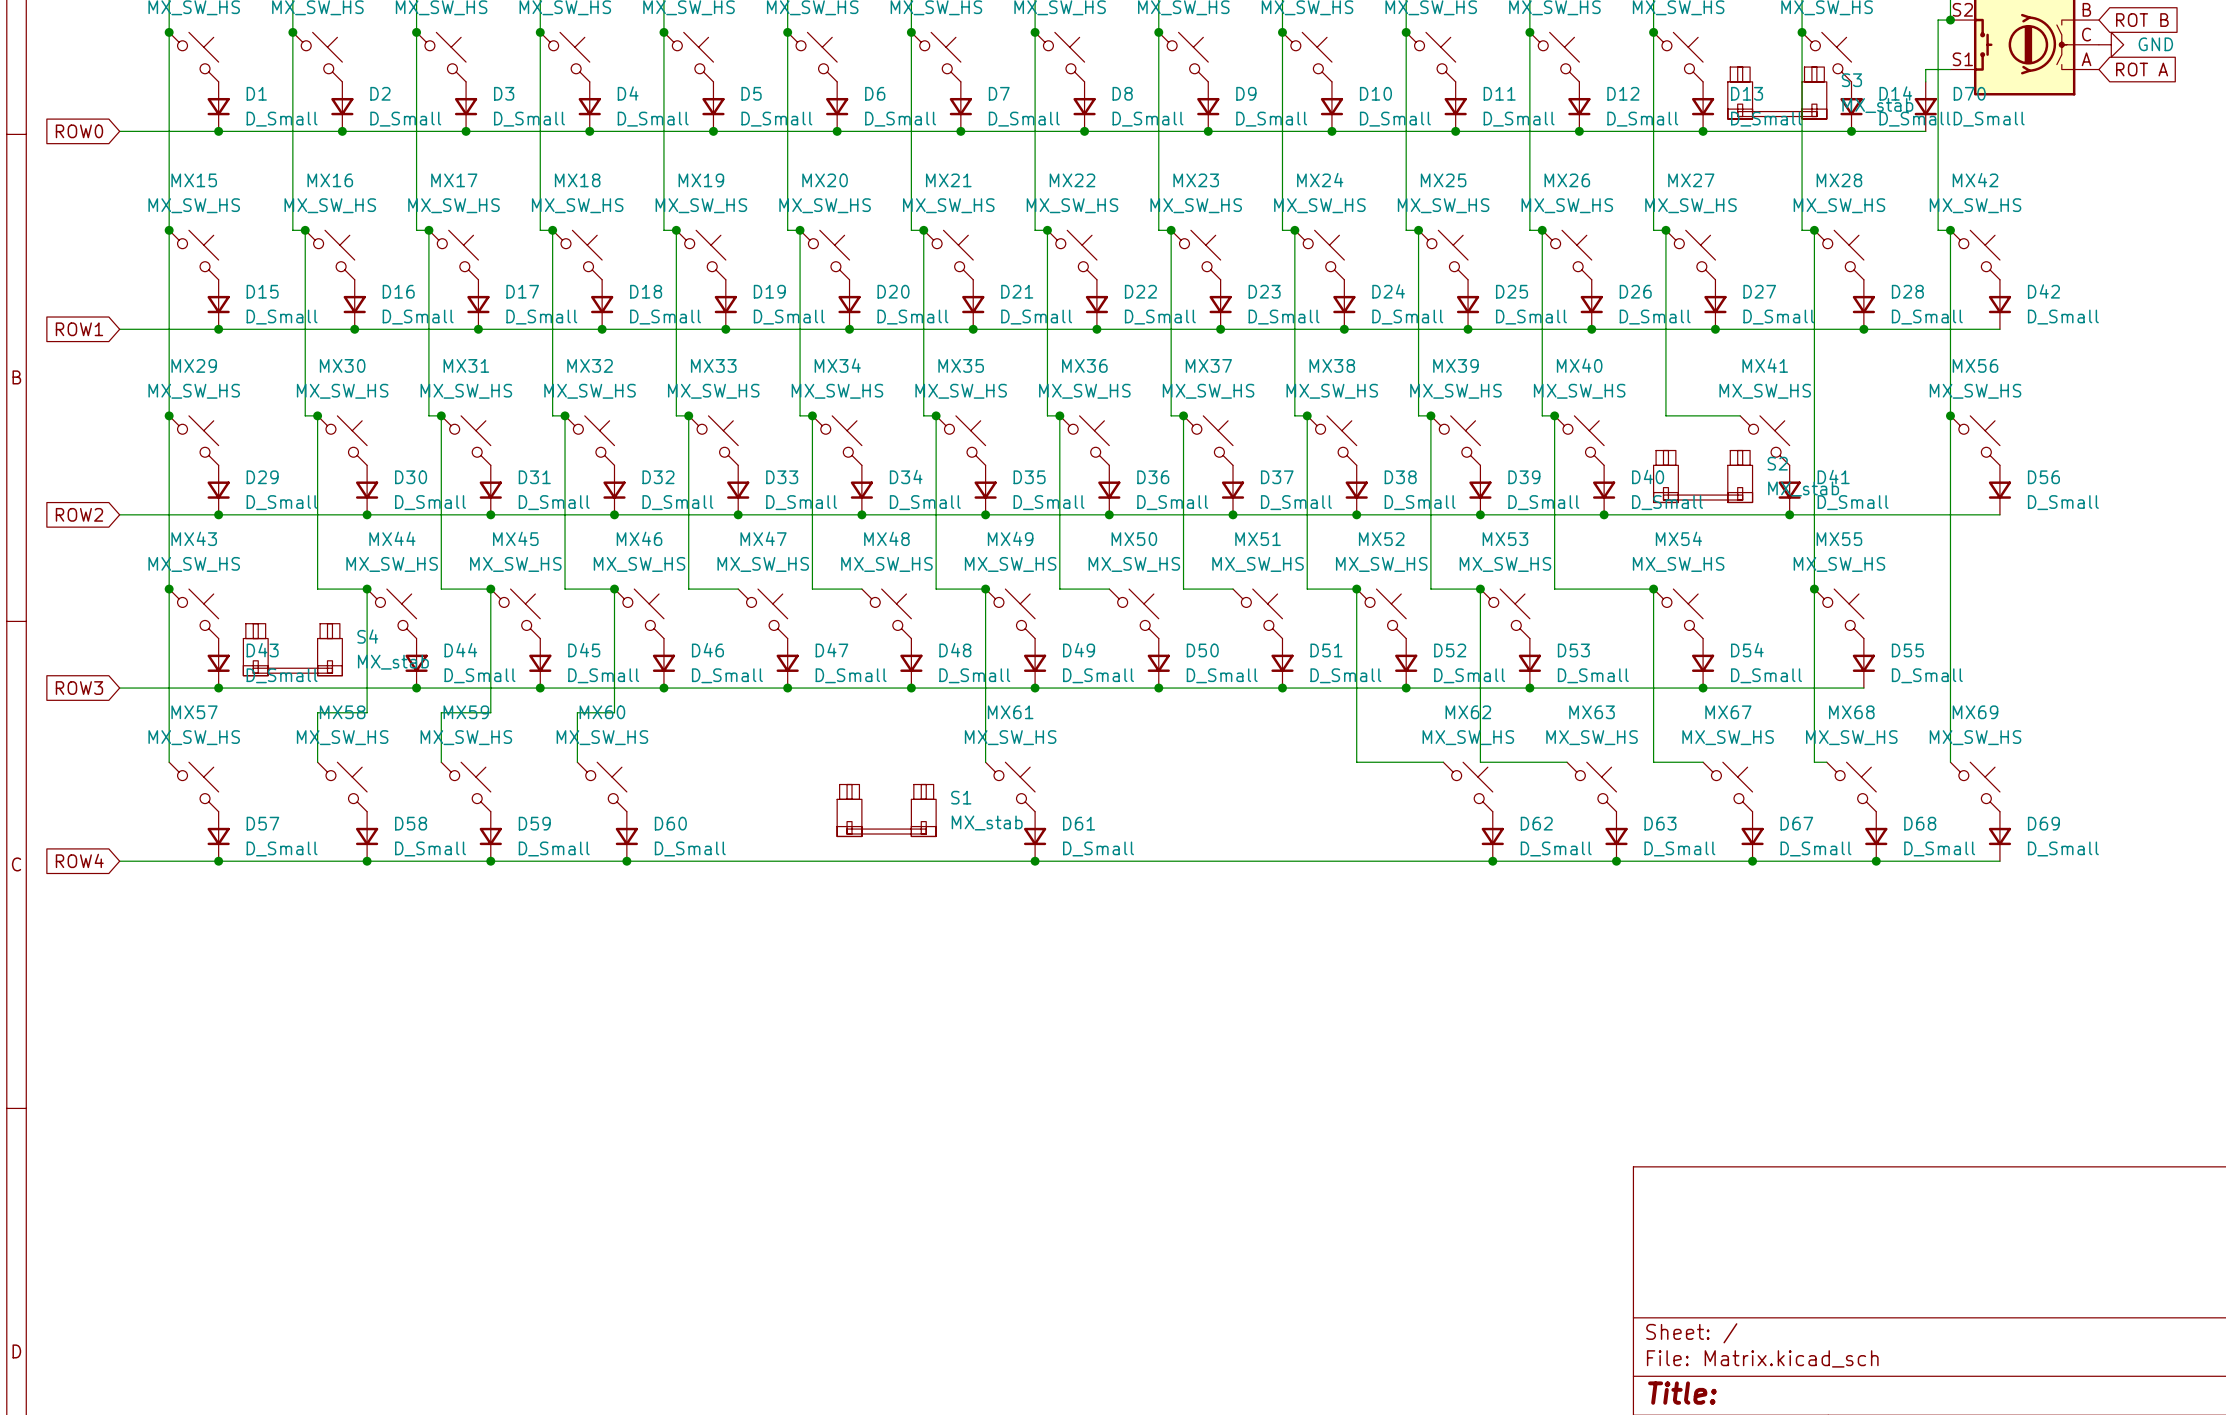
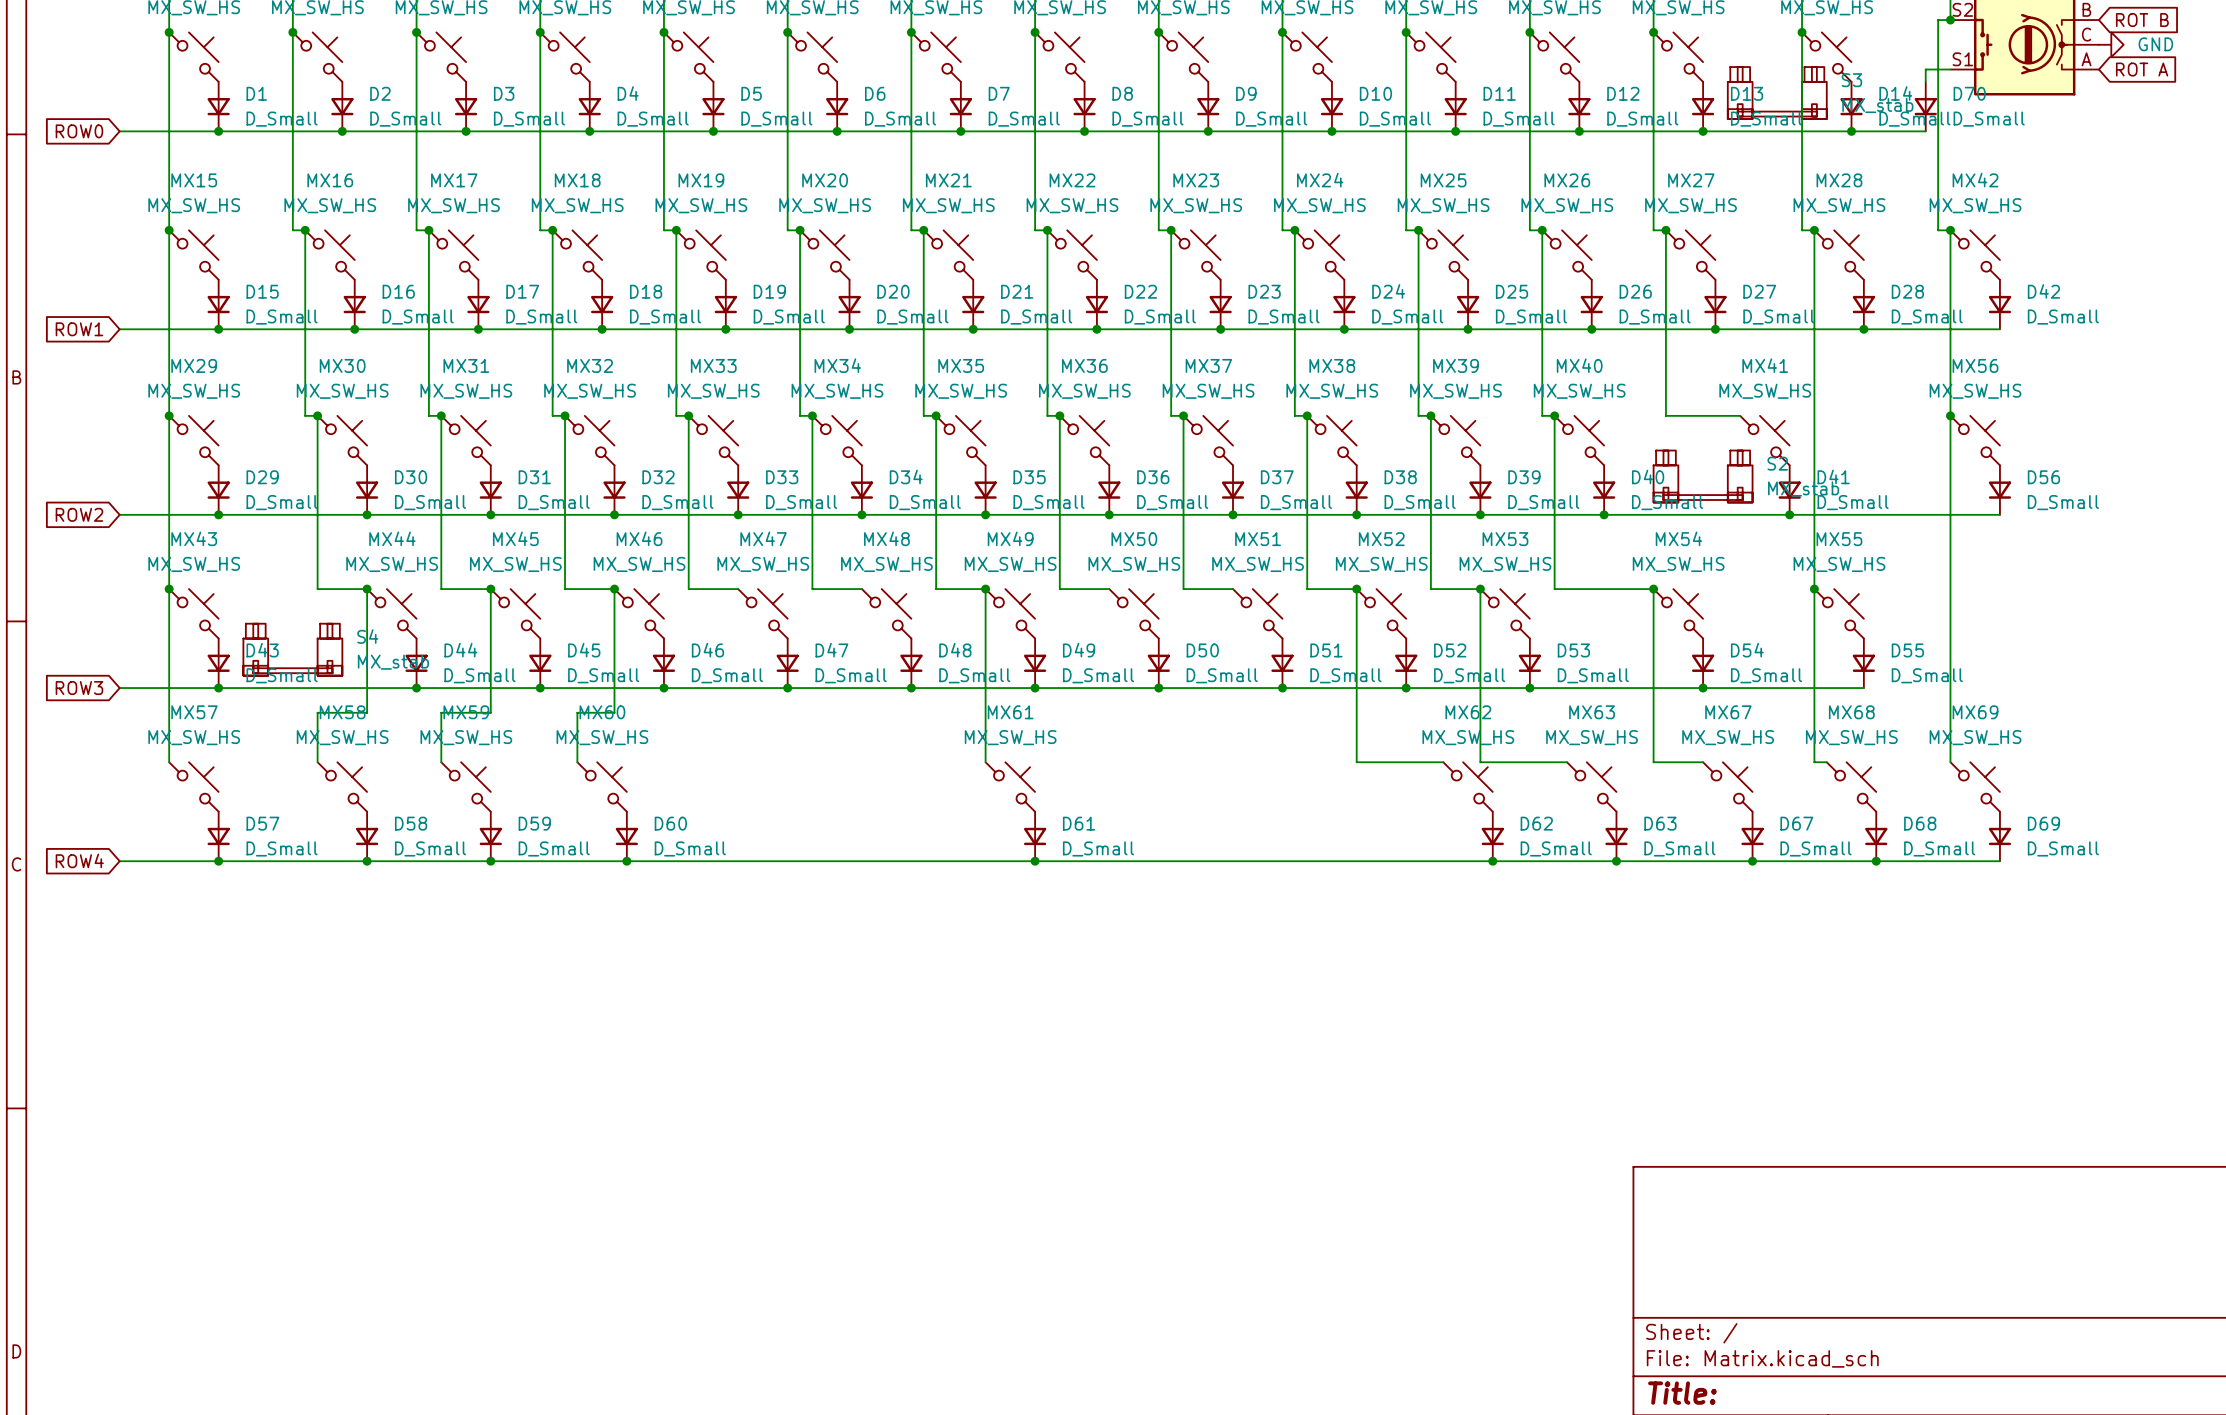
S1: MX_stab (886, 810) -> none

